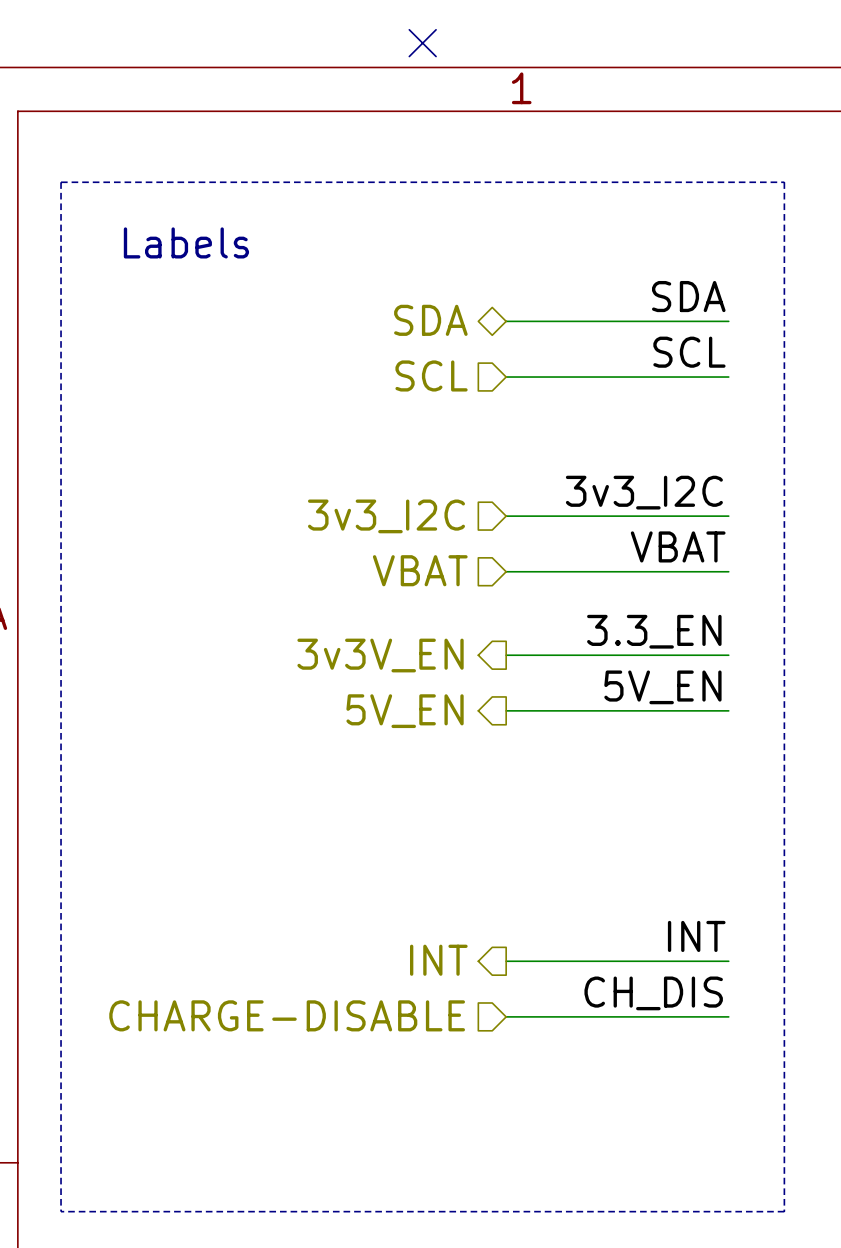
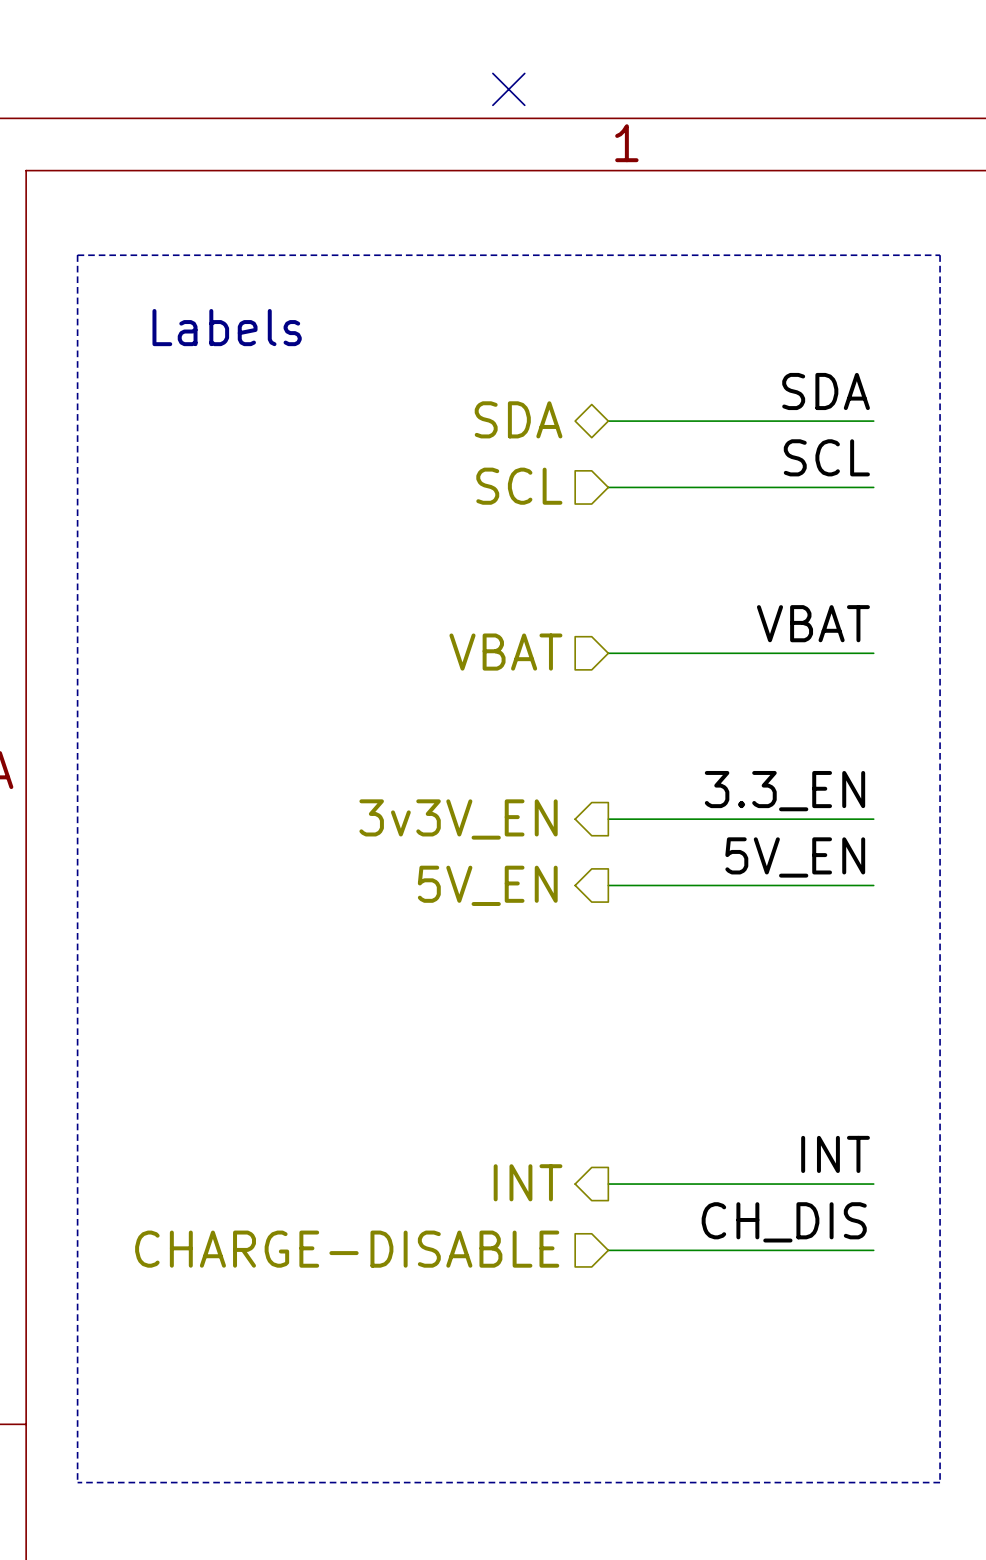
label: 3v3_I2C (644, 492) -> VBAT (813, 623)
hierarchical label: 3v3_I2C (386, 516) -> VBAT (505, 652)
label: VBAT (678, 546) -> none
hierarchical label: VBAT (420, 570) -> none
wire: (506, 571) (728, 571) -> none

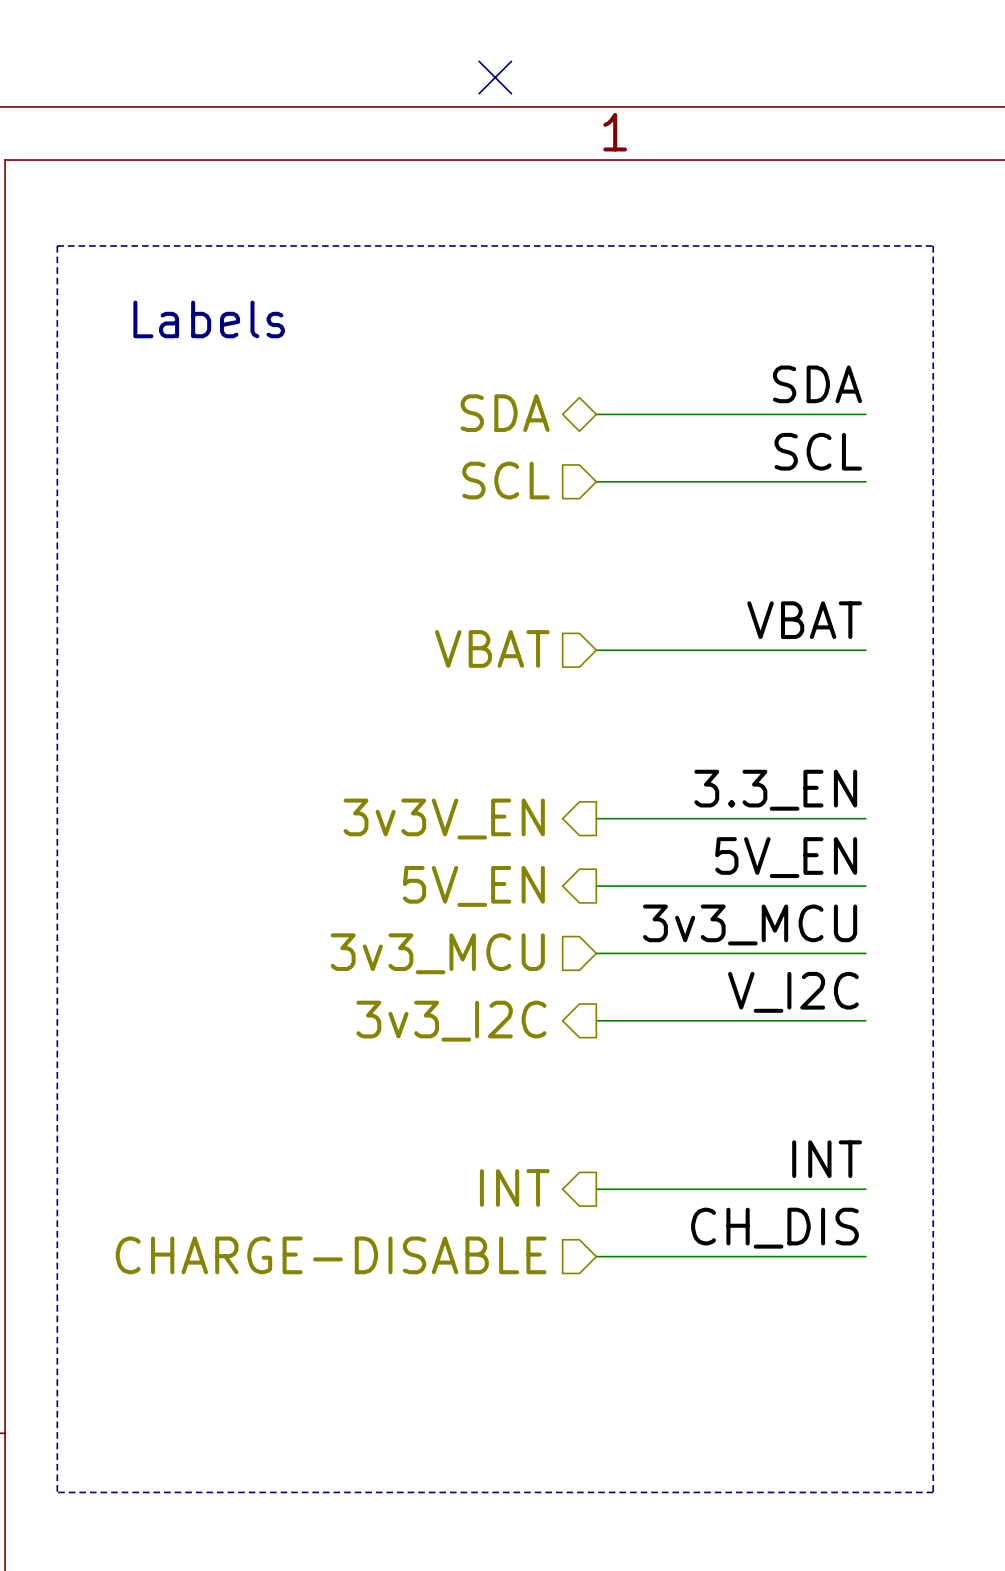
label: none -> 3v3_MCU (750, 924)
wire: none -> (596, 953) (865, 953)
hierarchical label: none -> 3v3_MCU (437, 953)
label: none -> V_I2C (793, 992)
hierarchical label: none -> 3v3_I2C (451, 1021)
wire: none -> (596, 1020) (865, 1020)

